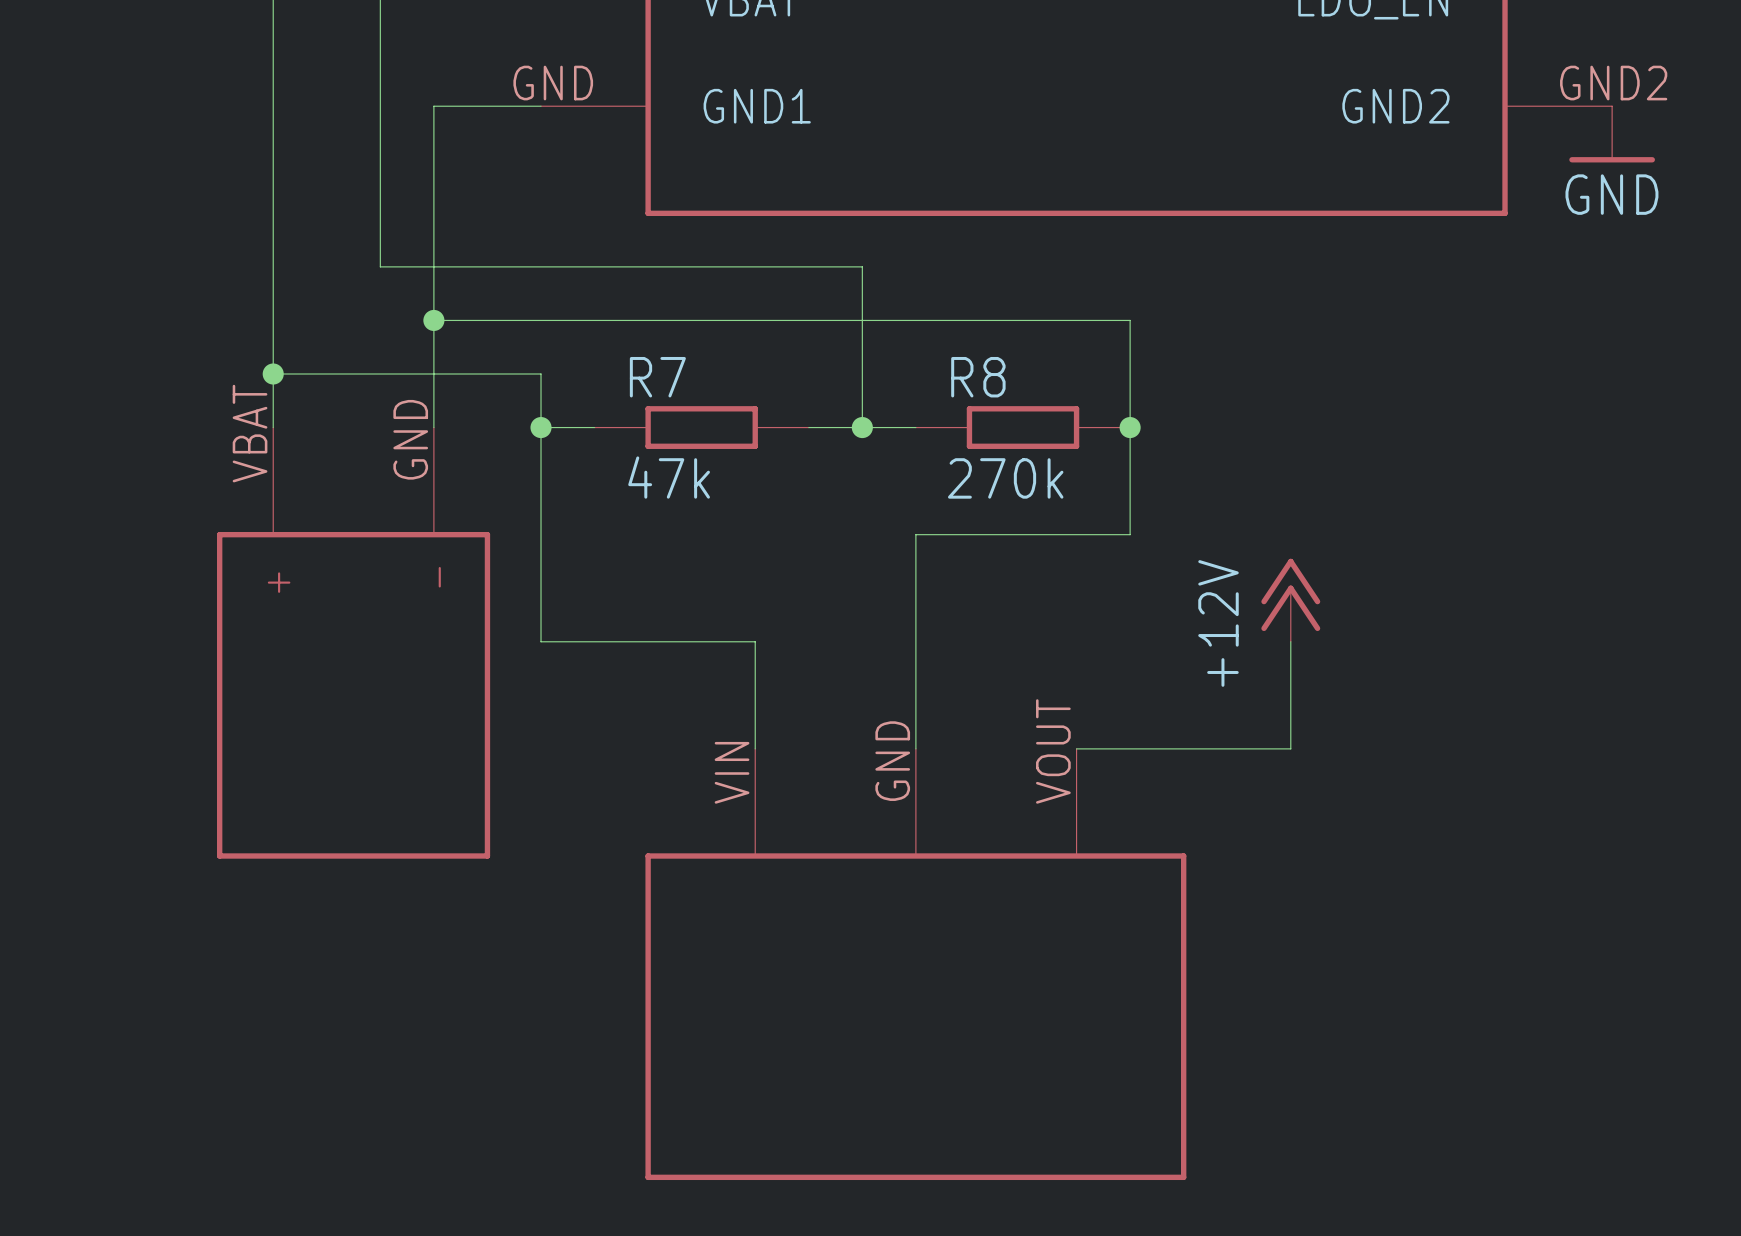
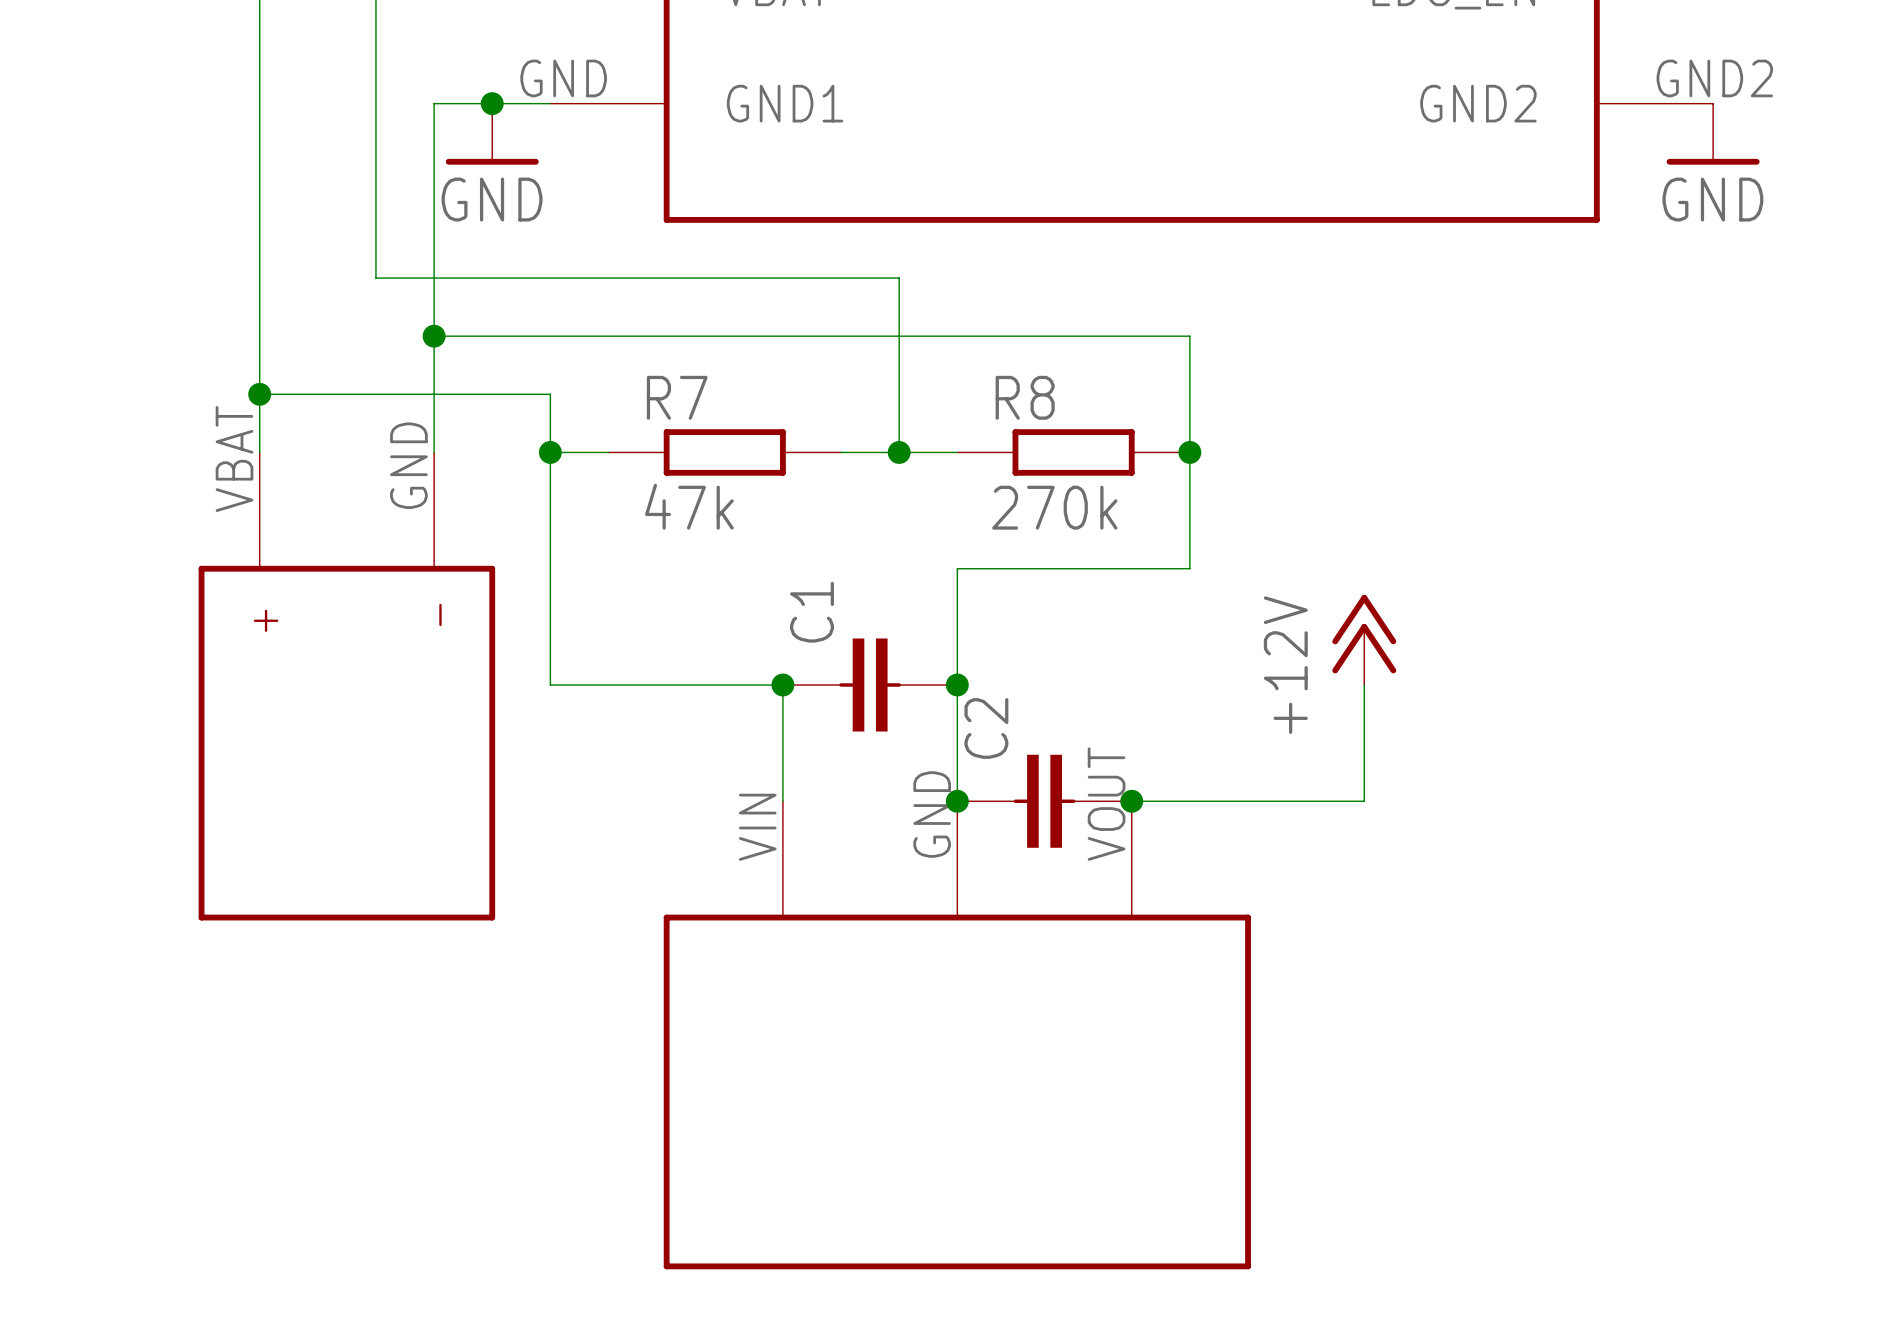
junction: none -> (492, 103)
power symbol: none -> GND (492, 134)
junction: none -> (782, 685)
C1: none -> (870, 685)
junction: none -> (957, 685)
junction: none -> (957, 801)
C2: none -> (1044, 801)
junction: none -> (1131, 801)

